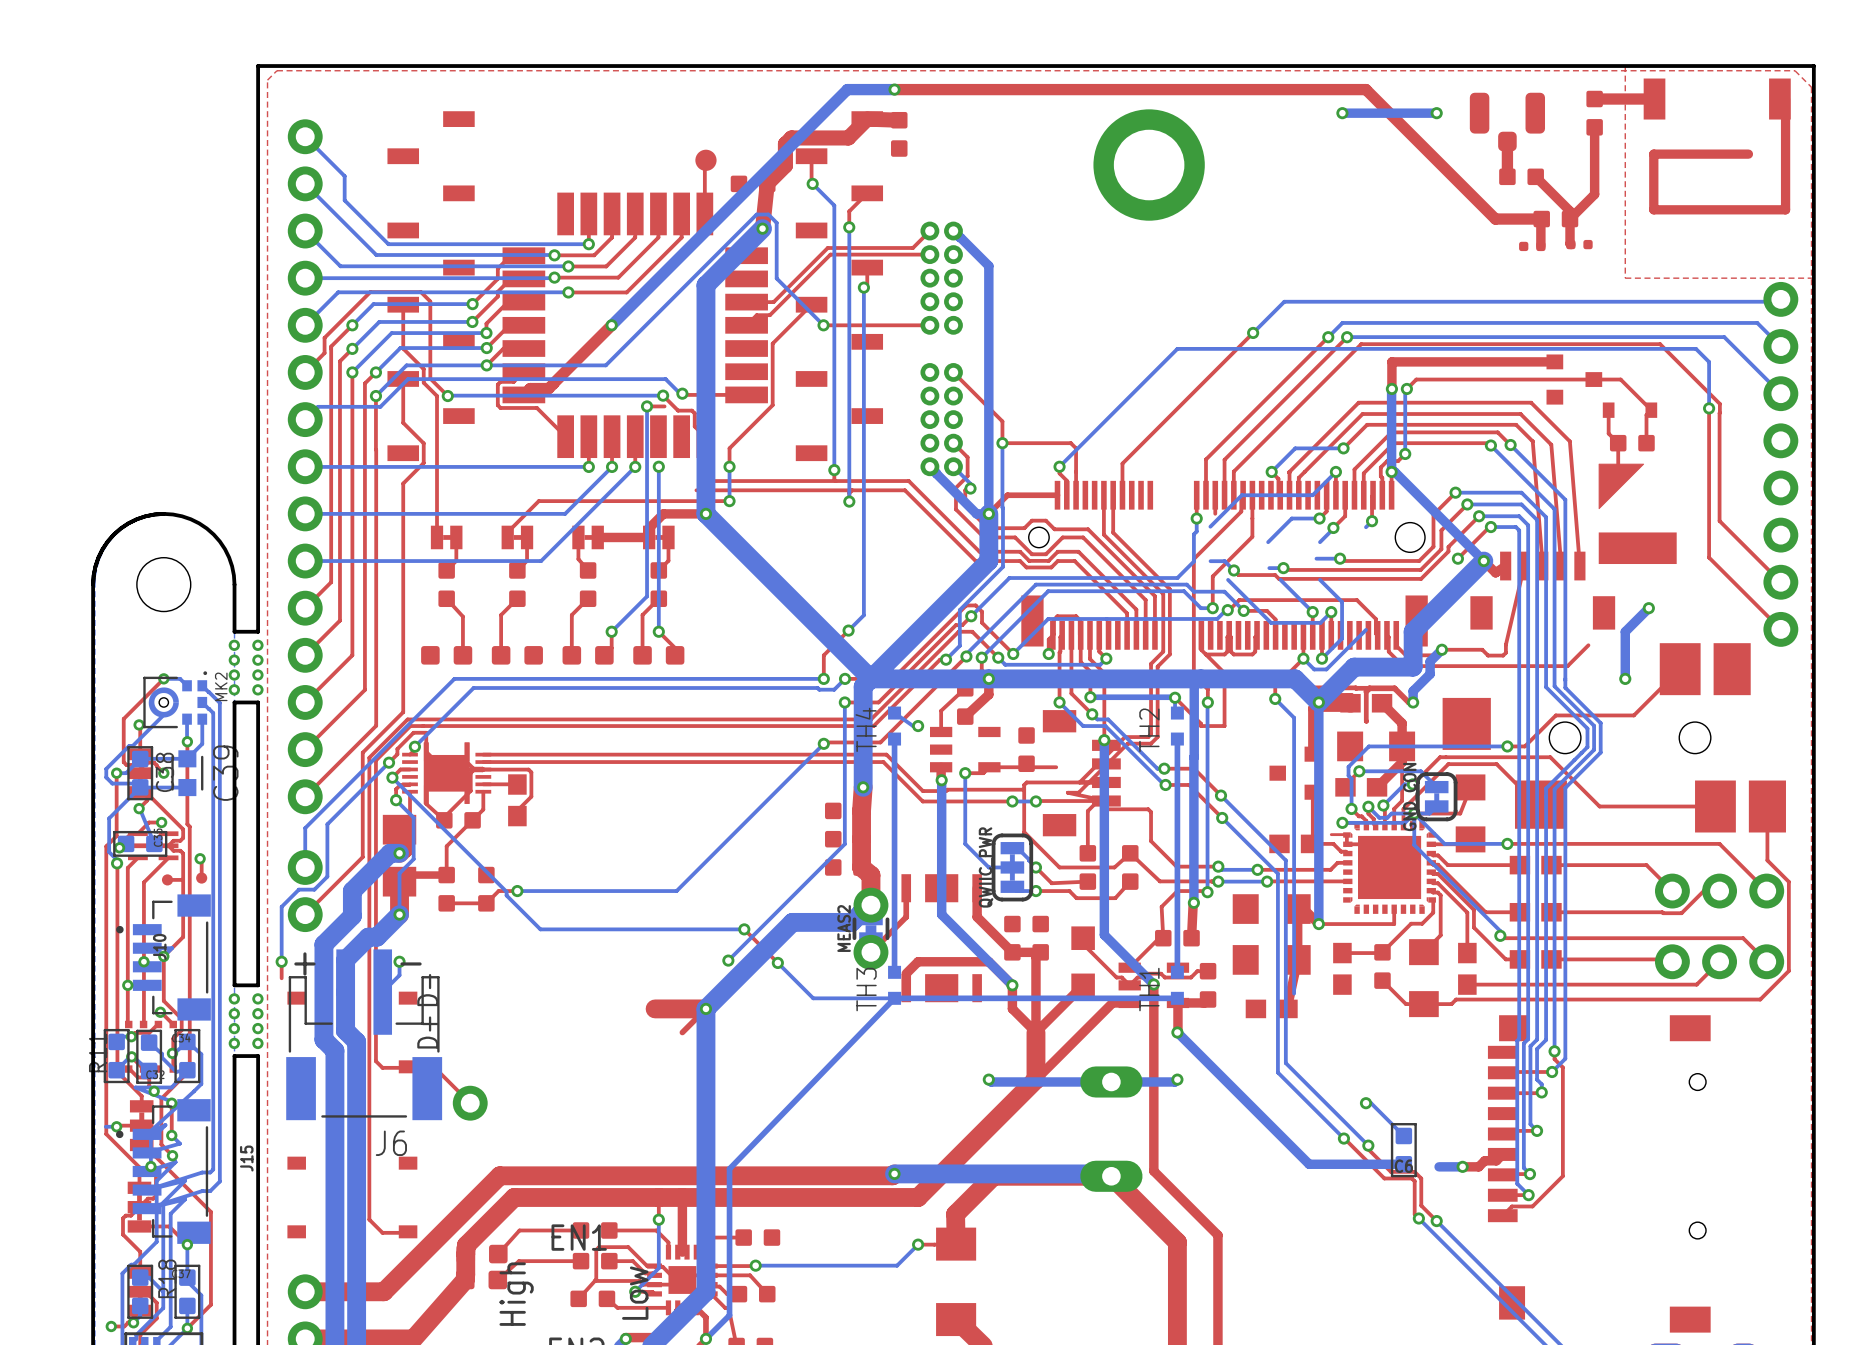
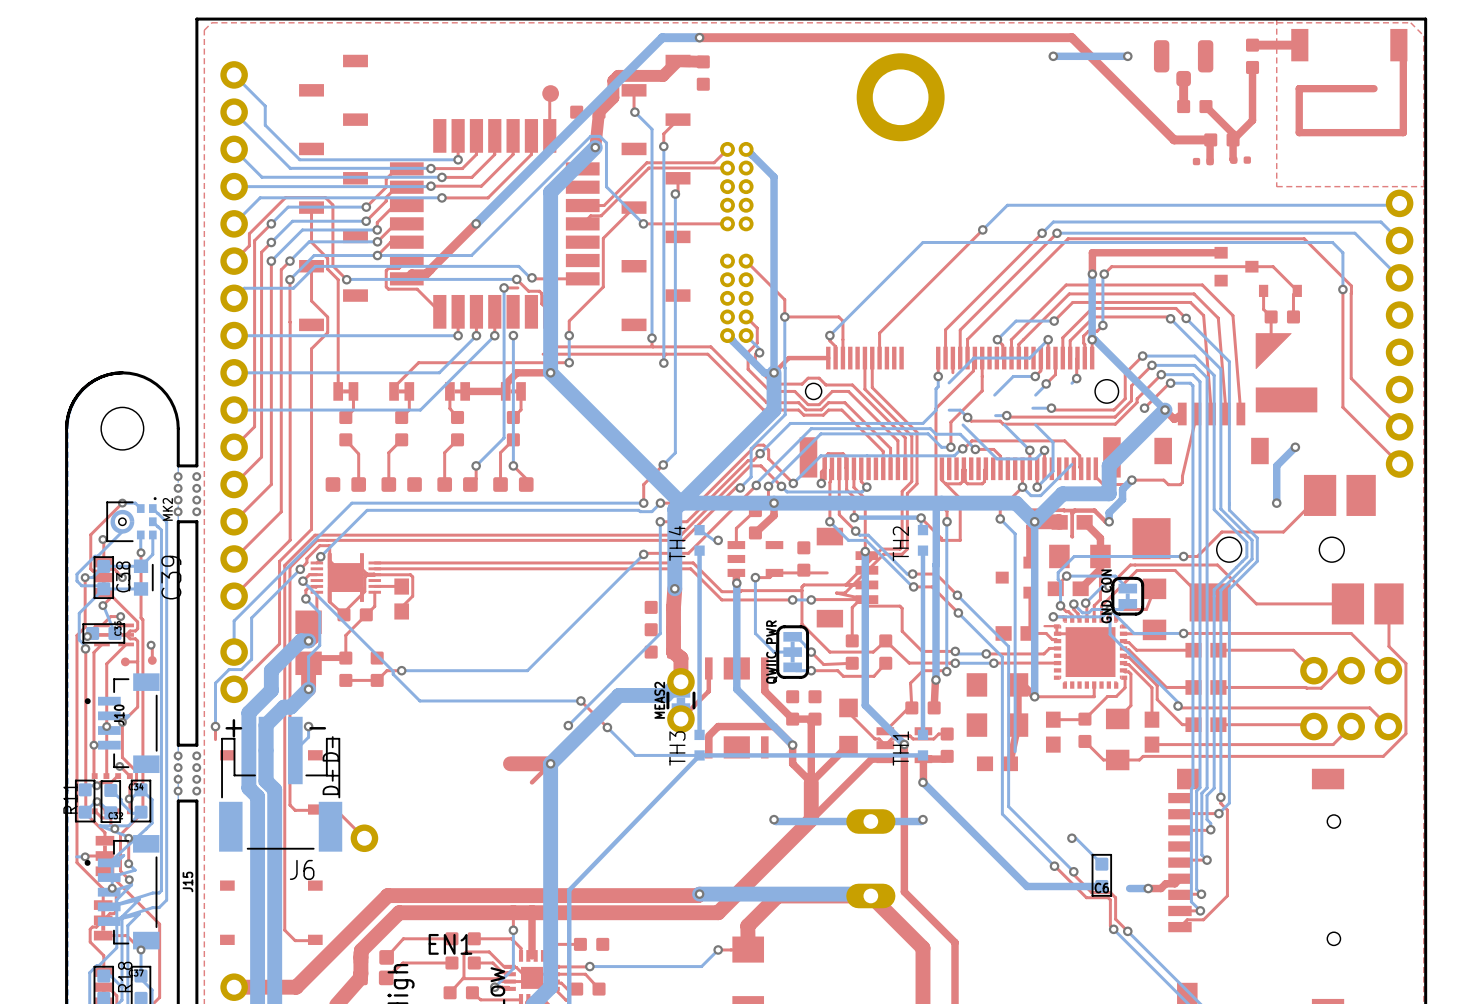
top track: (1386, 635) (1388, 637) (1388, 651) (1403, 666) (1567, 666) (1588, 645) -> none

